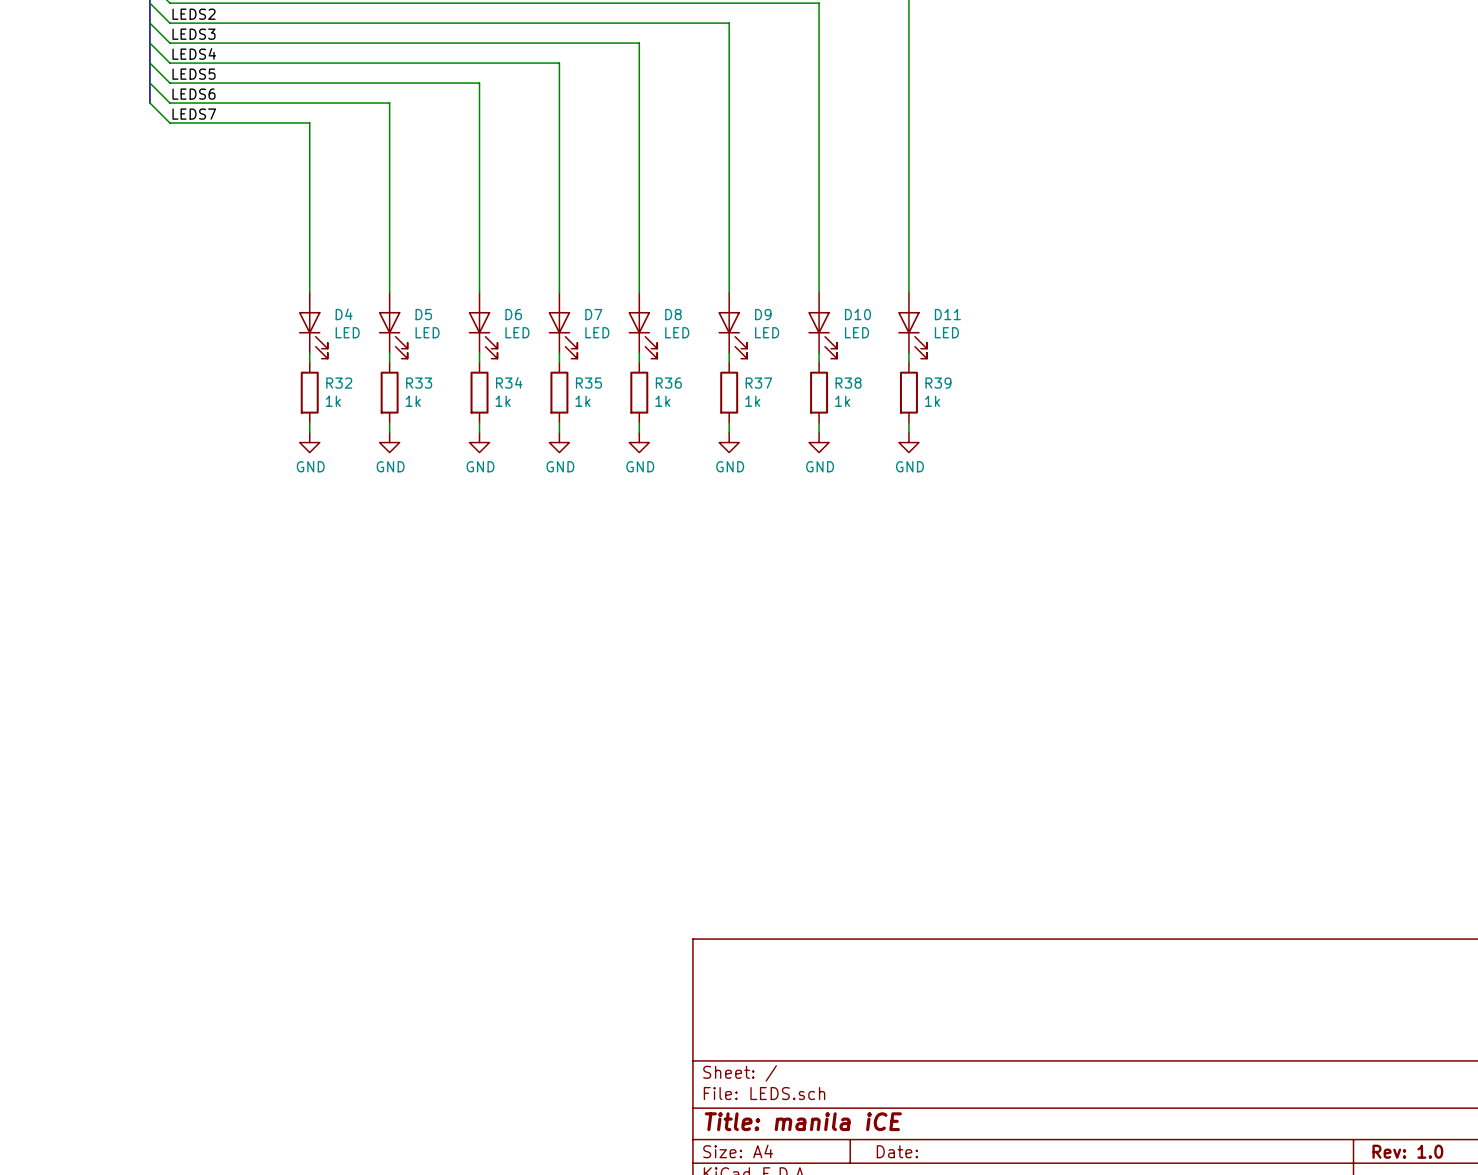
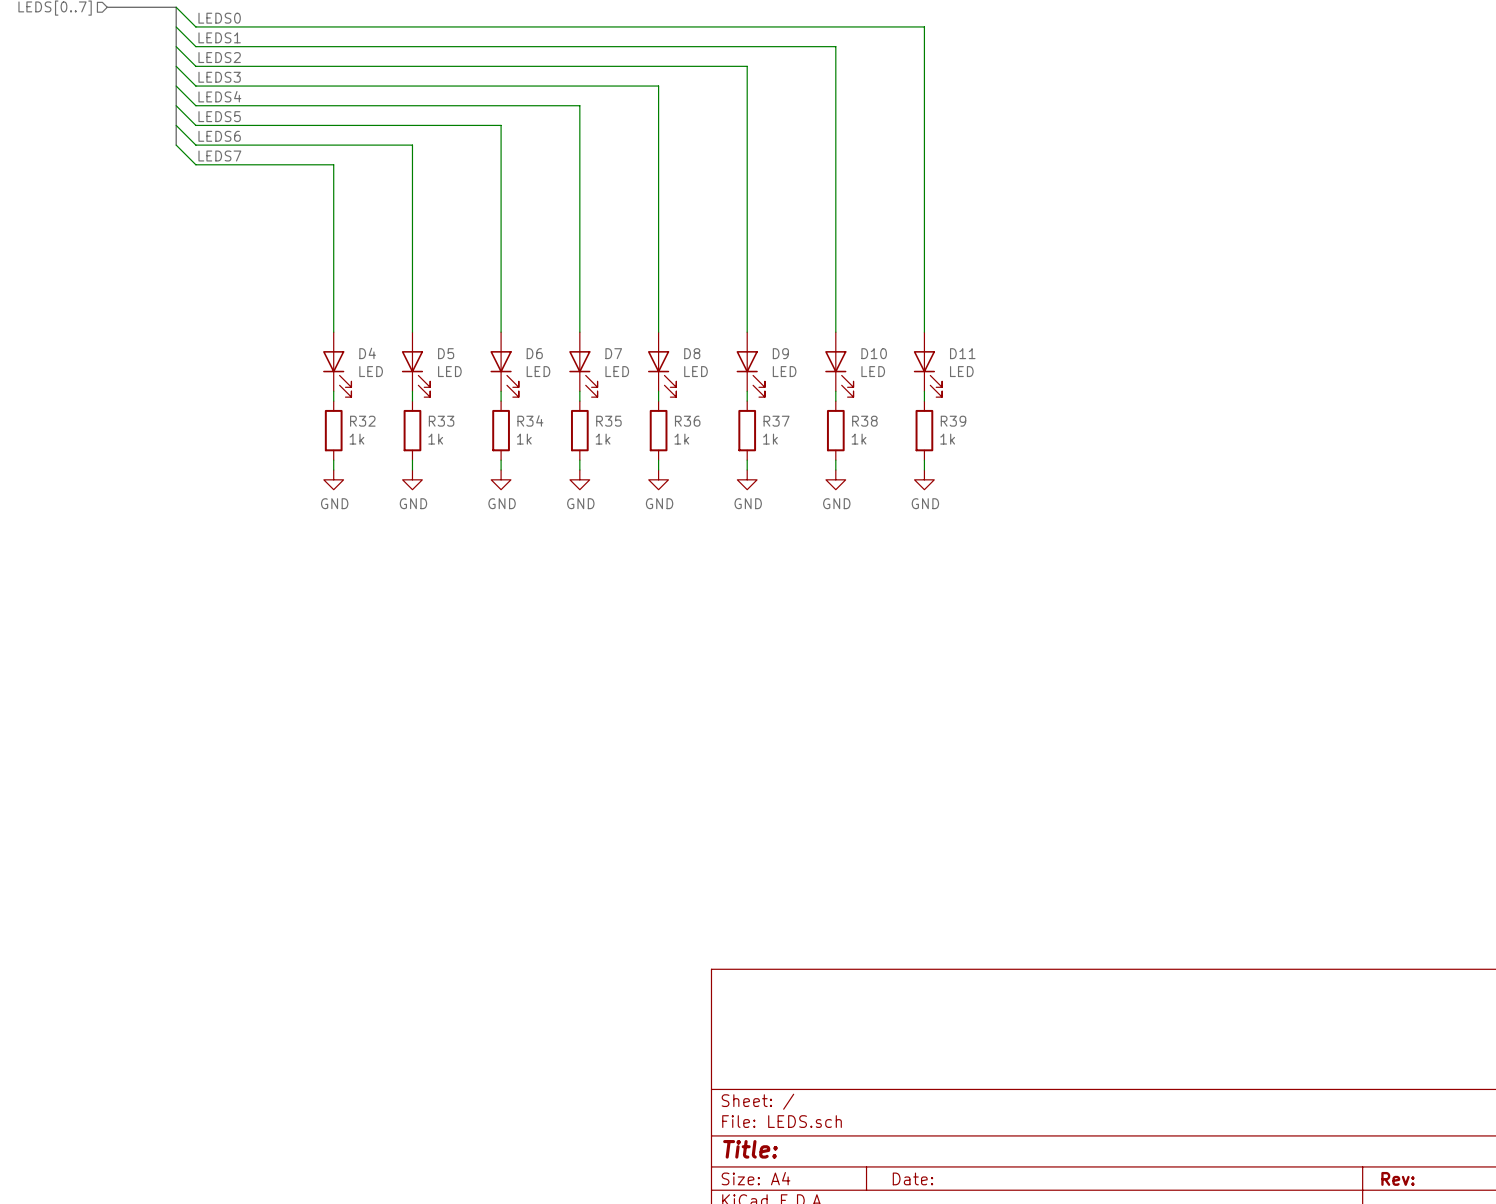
title block: Title: manila iCE (803, 1121) -> Title: (750, 1149)
title block: Rev: 1.0 (1407, 1151) -> Rev: (1397, 1178)

